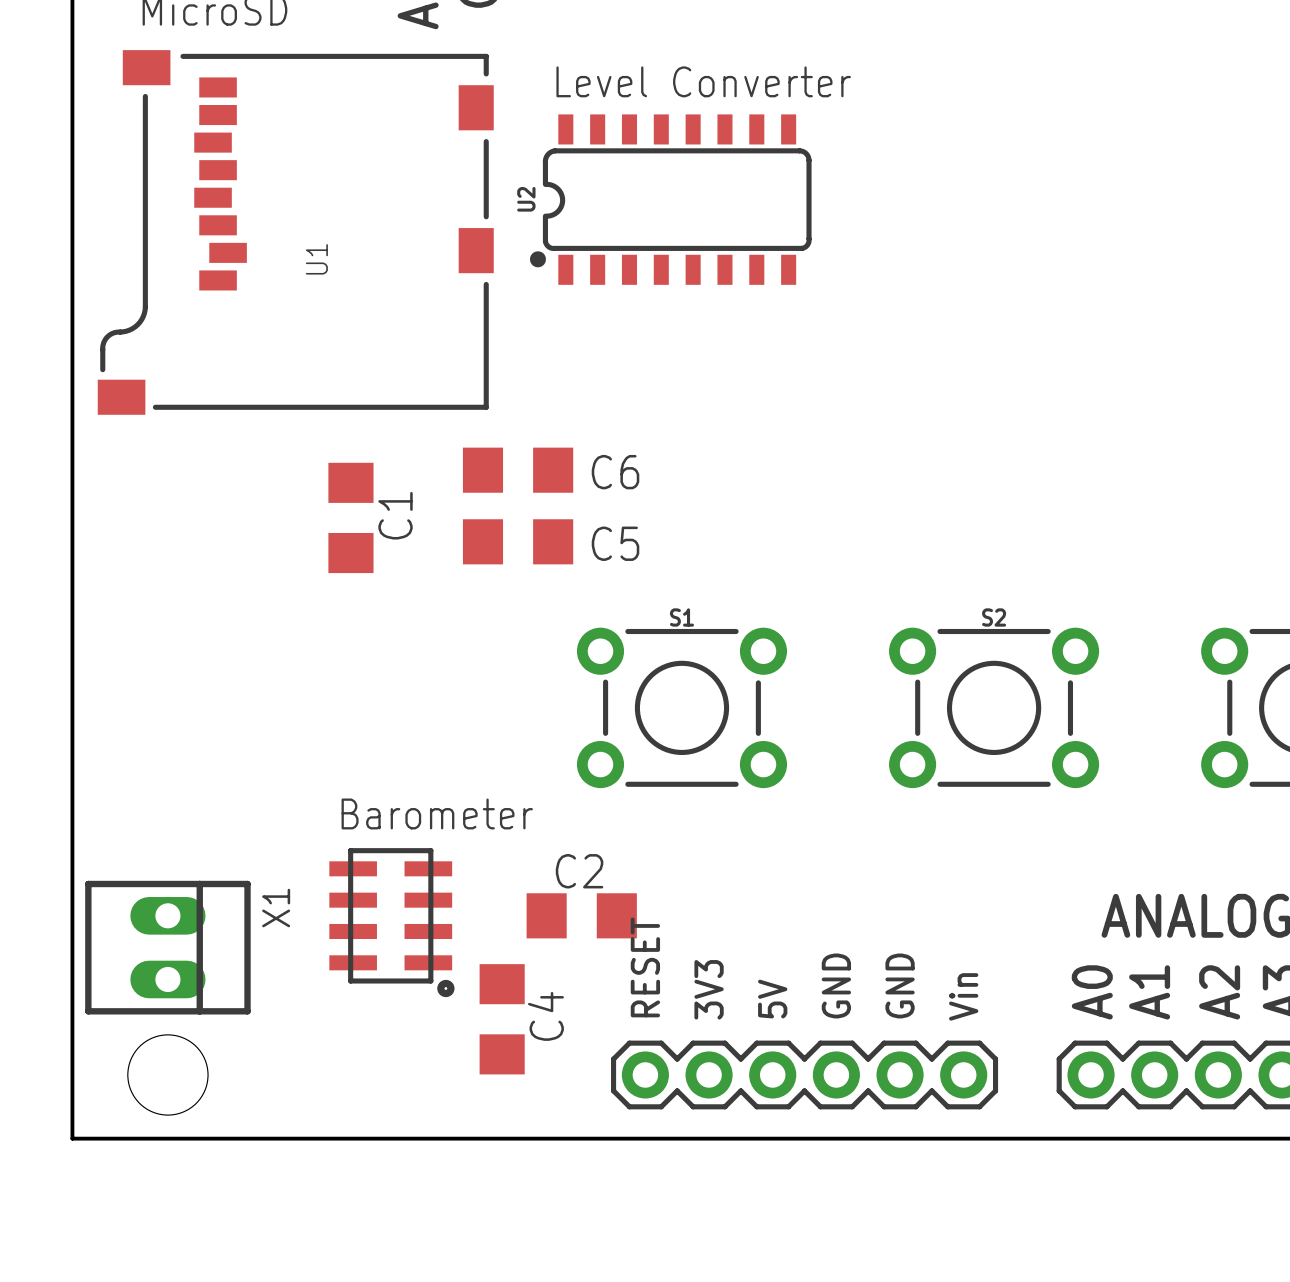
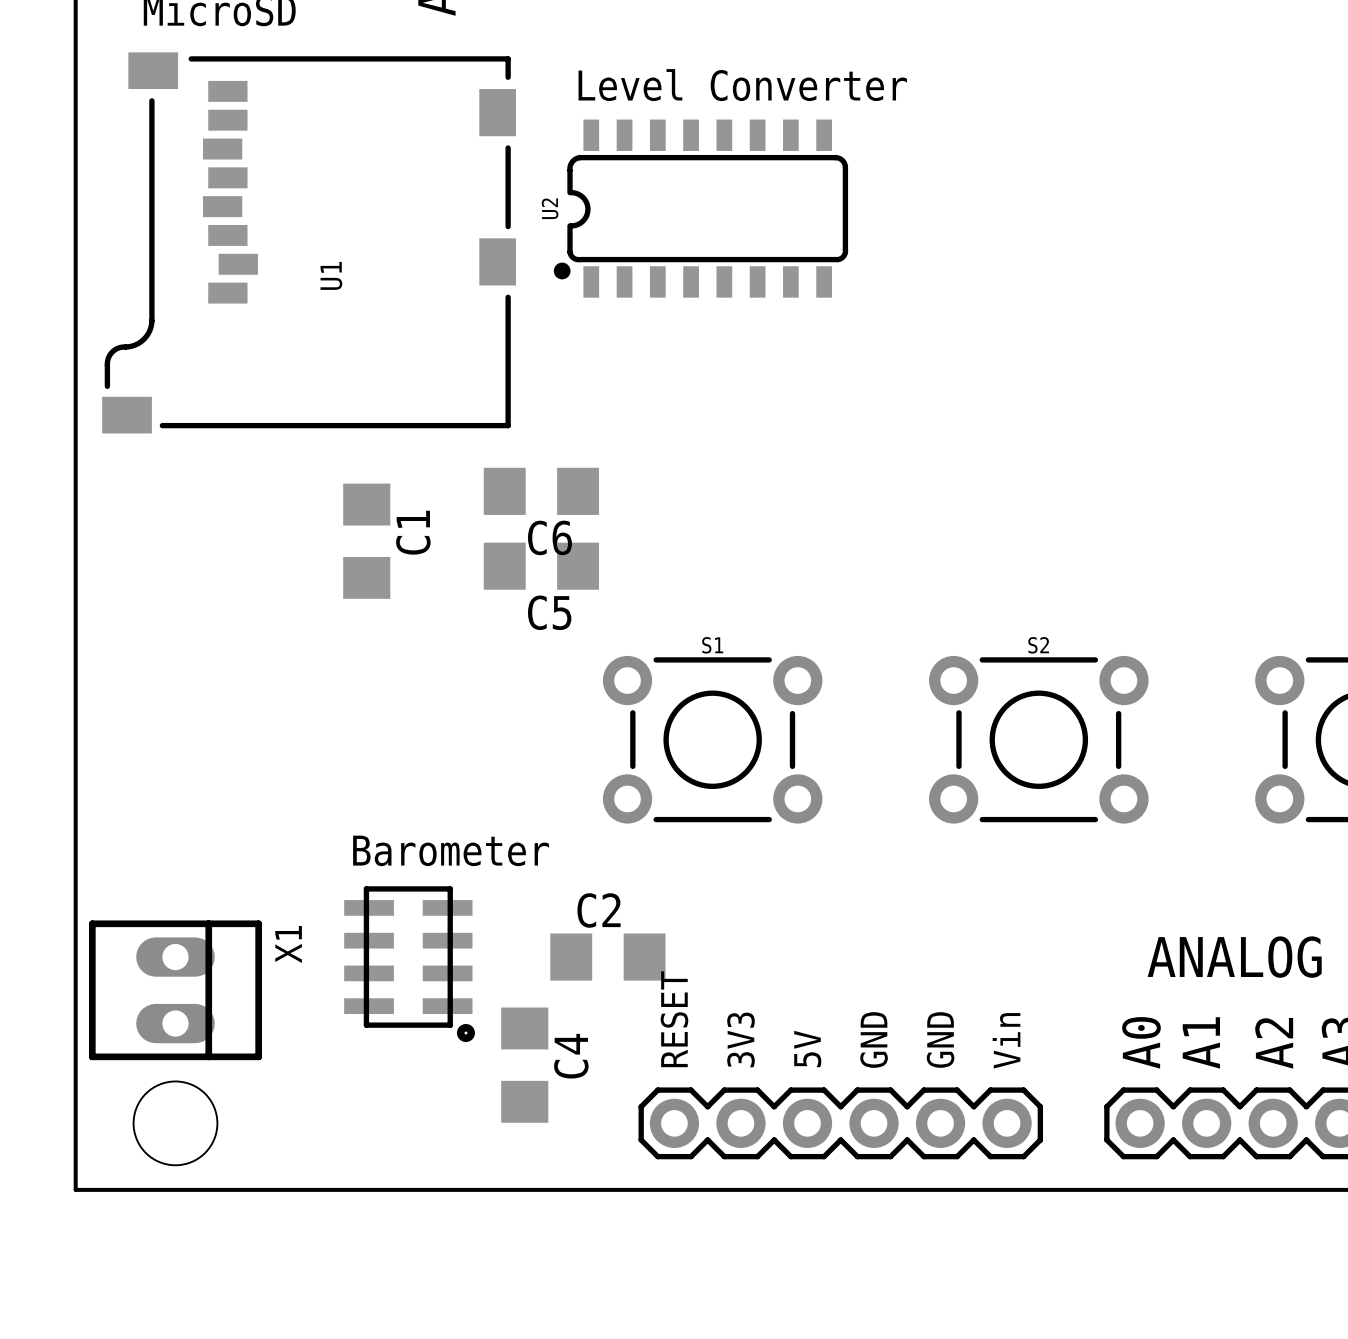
C6 name position: C6 (615, 472) -> C6 (549, 537)
C5 name position: C5 (615, 543) -> C5 (549, 612)

